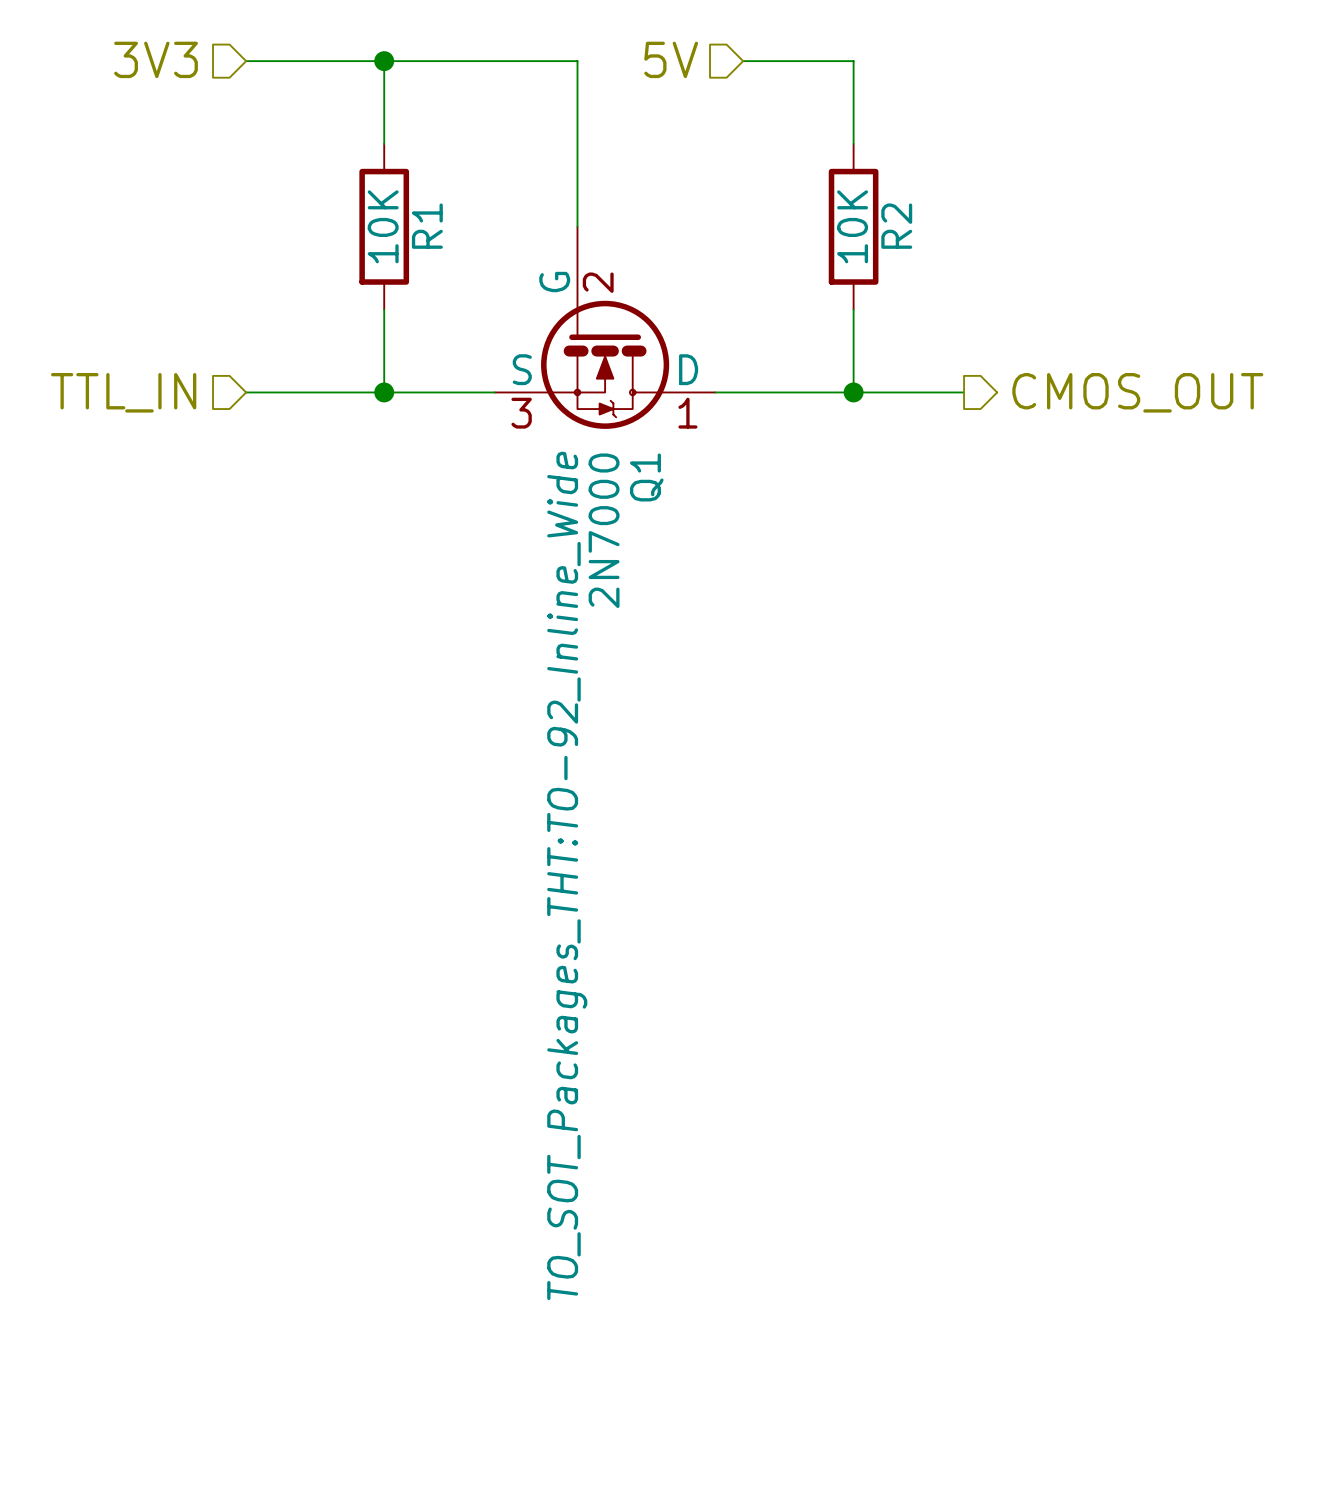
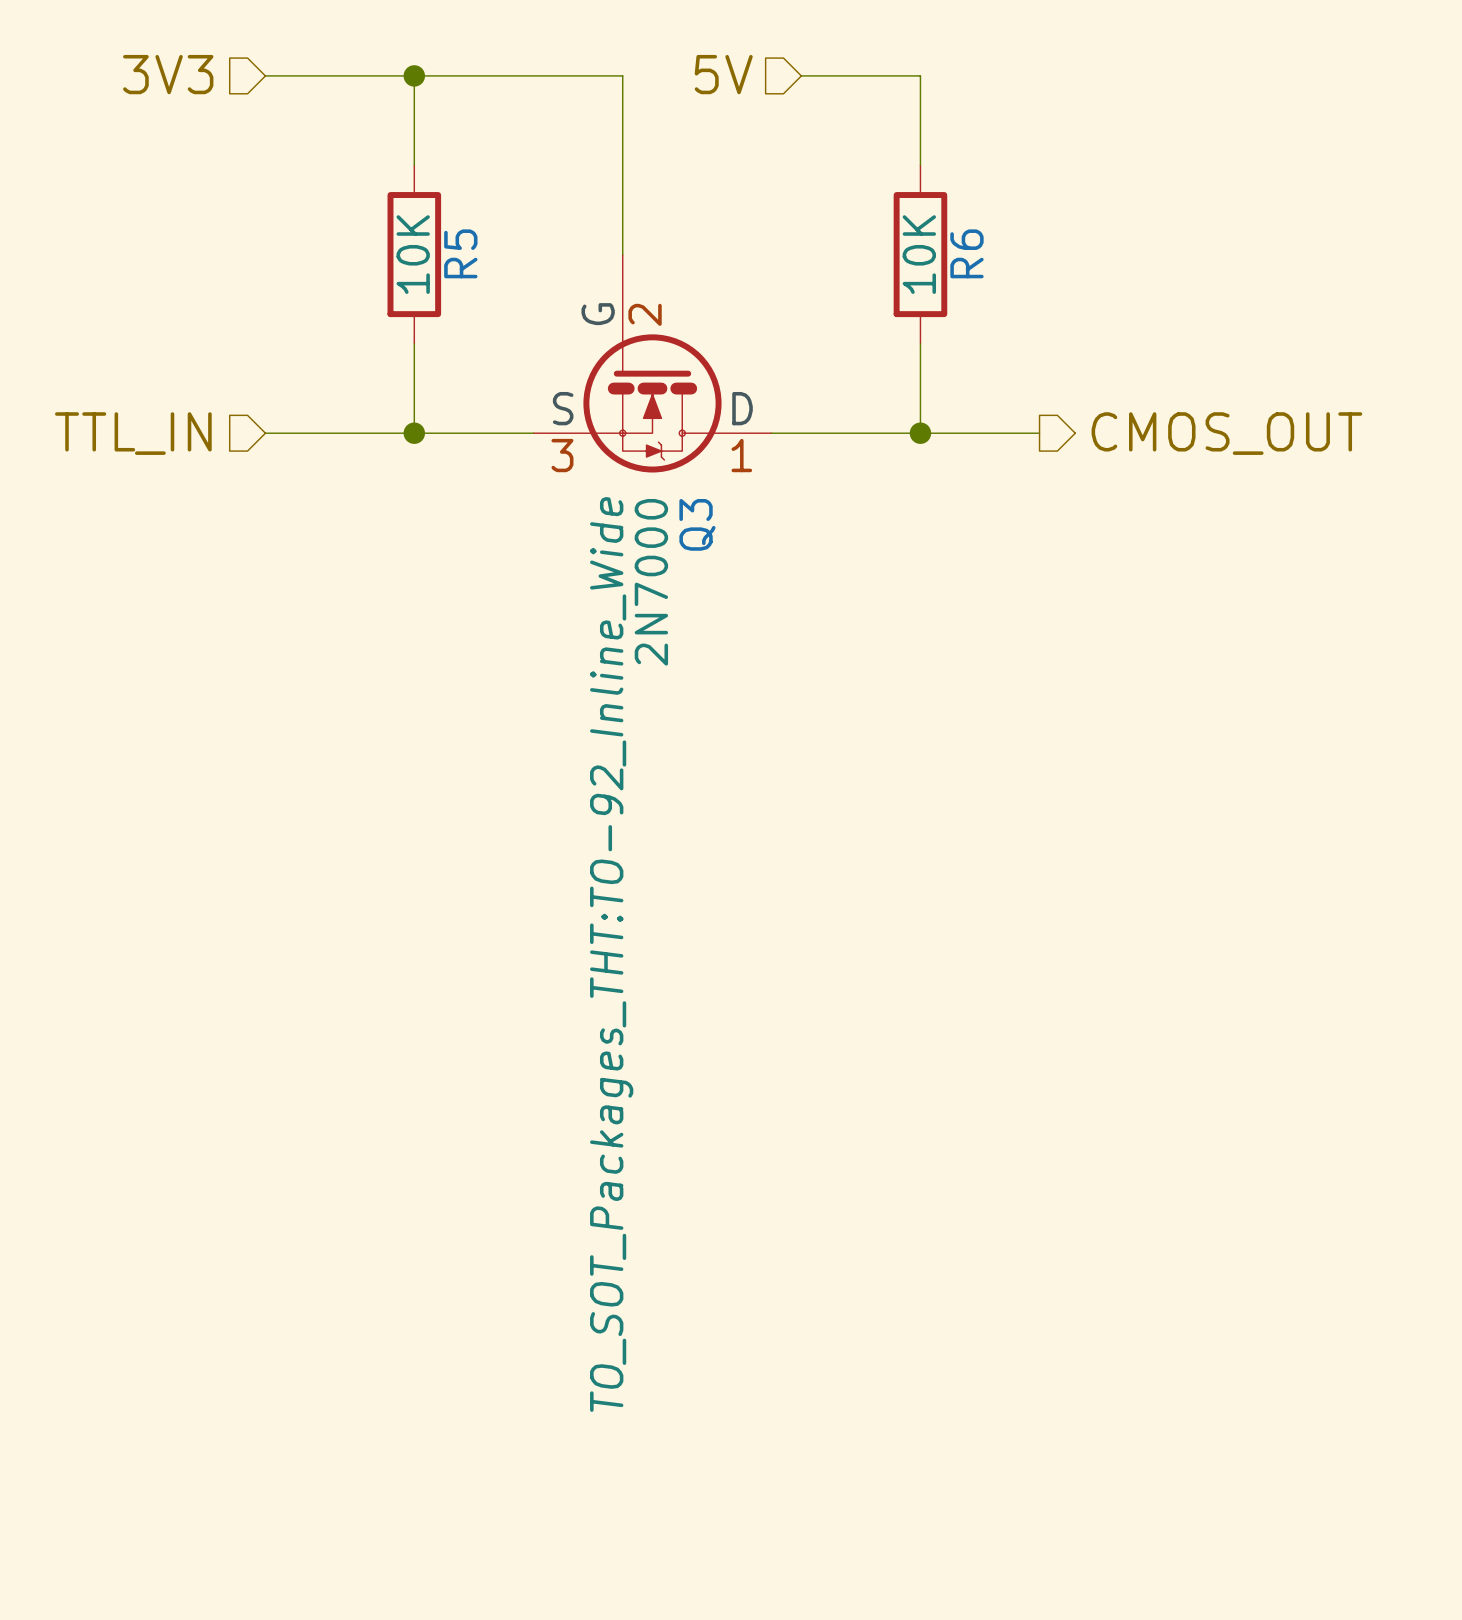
R1 name: R1 (427, 226) -> R5 (460, 253)
R2 name: R2 (896, 226) -> R6 (966, 253)
Q1 name: Q1 (646, 477) -> Q3 (697, 524)

